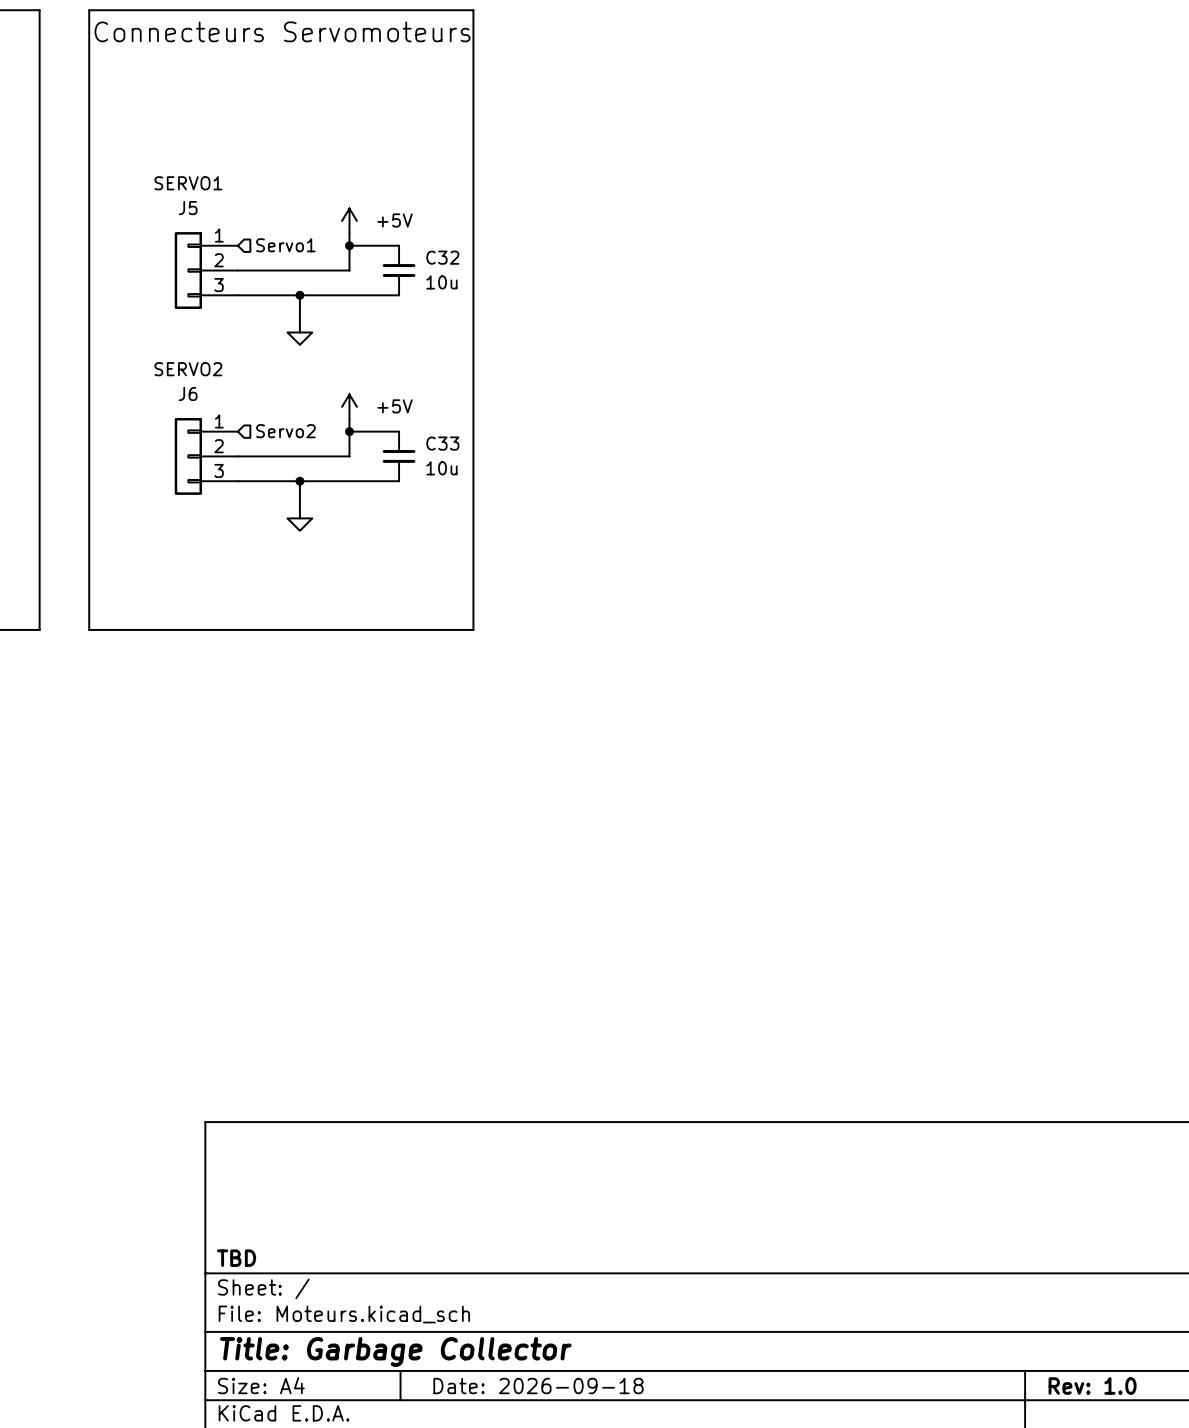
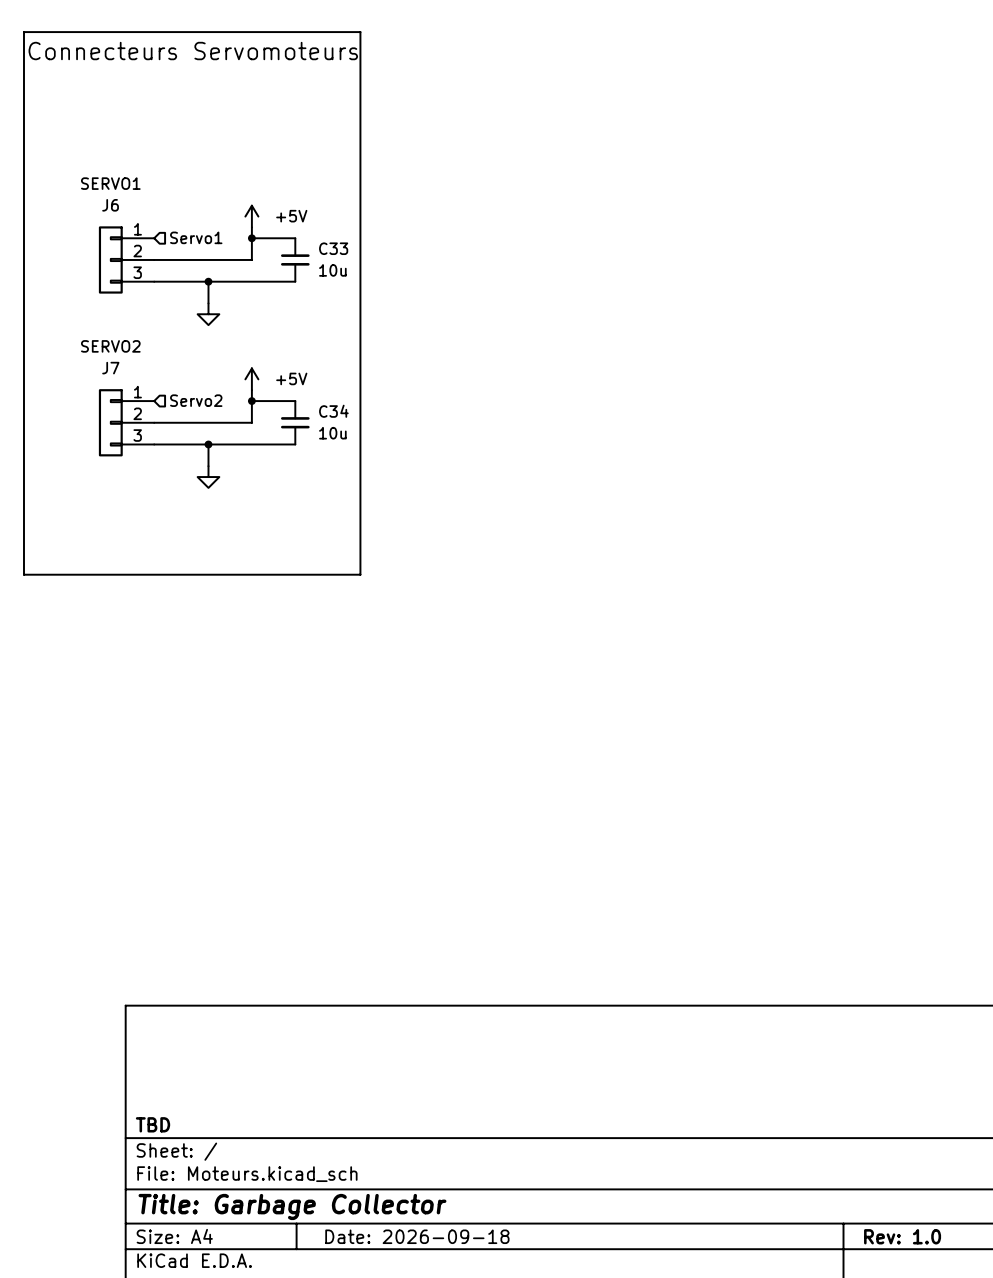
J5 name: J5 (188, 208) -> J6 (110, 205)
C32 name: C32 (442, 257) -> C33 (333, 248)
J6 name: J6 (188, 393) -> J7 (110, 368)
C33 name: C33 (442, 443) -> C34 (333, 411)

